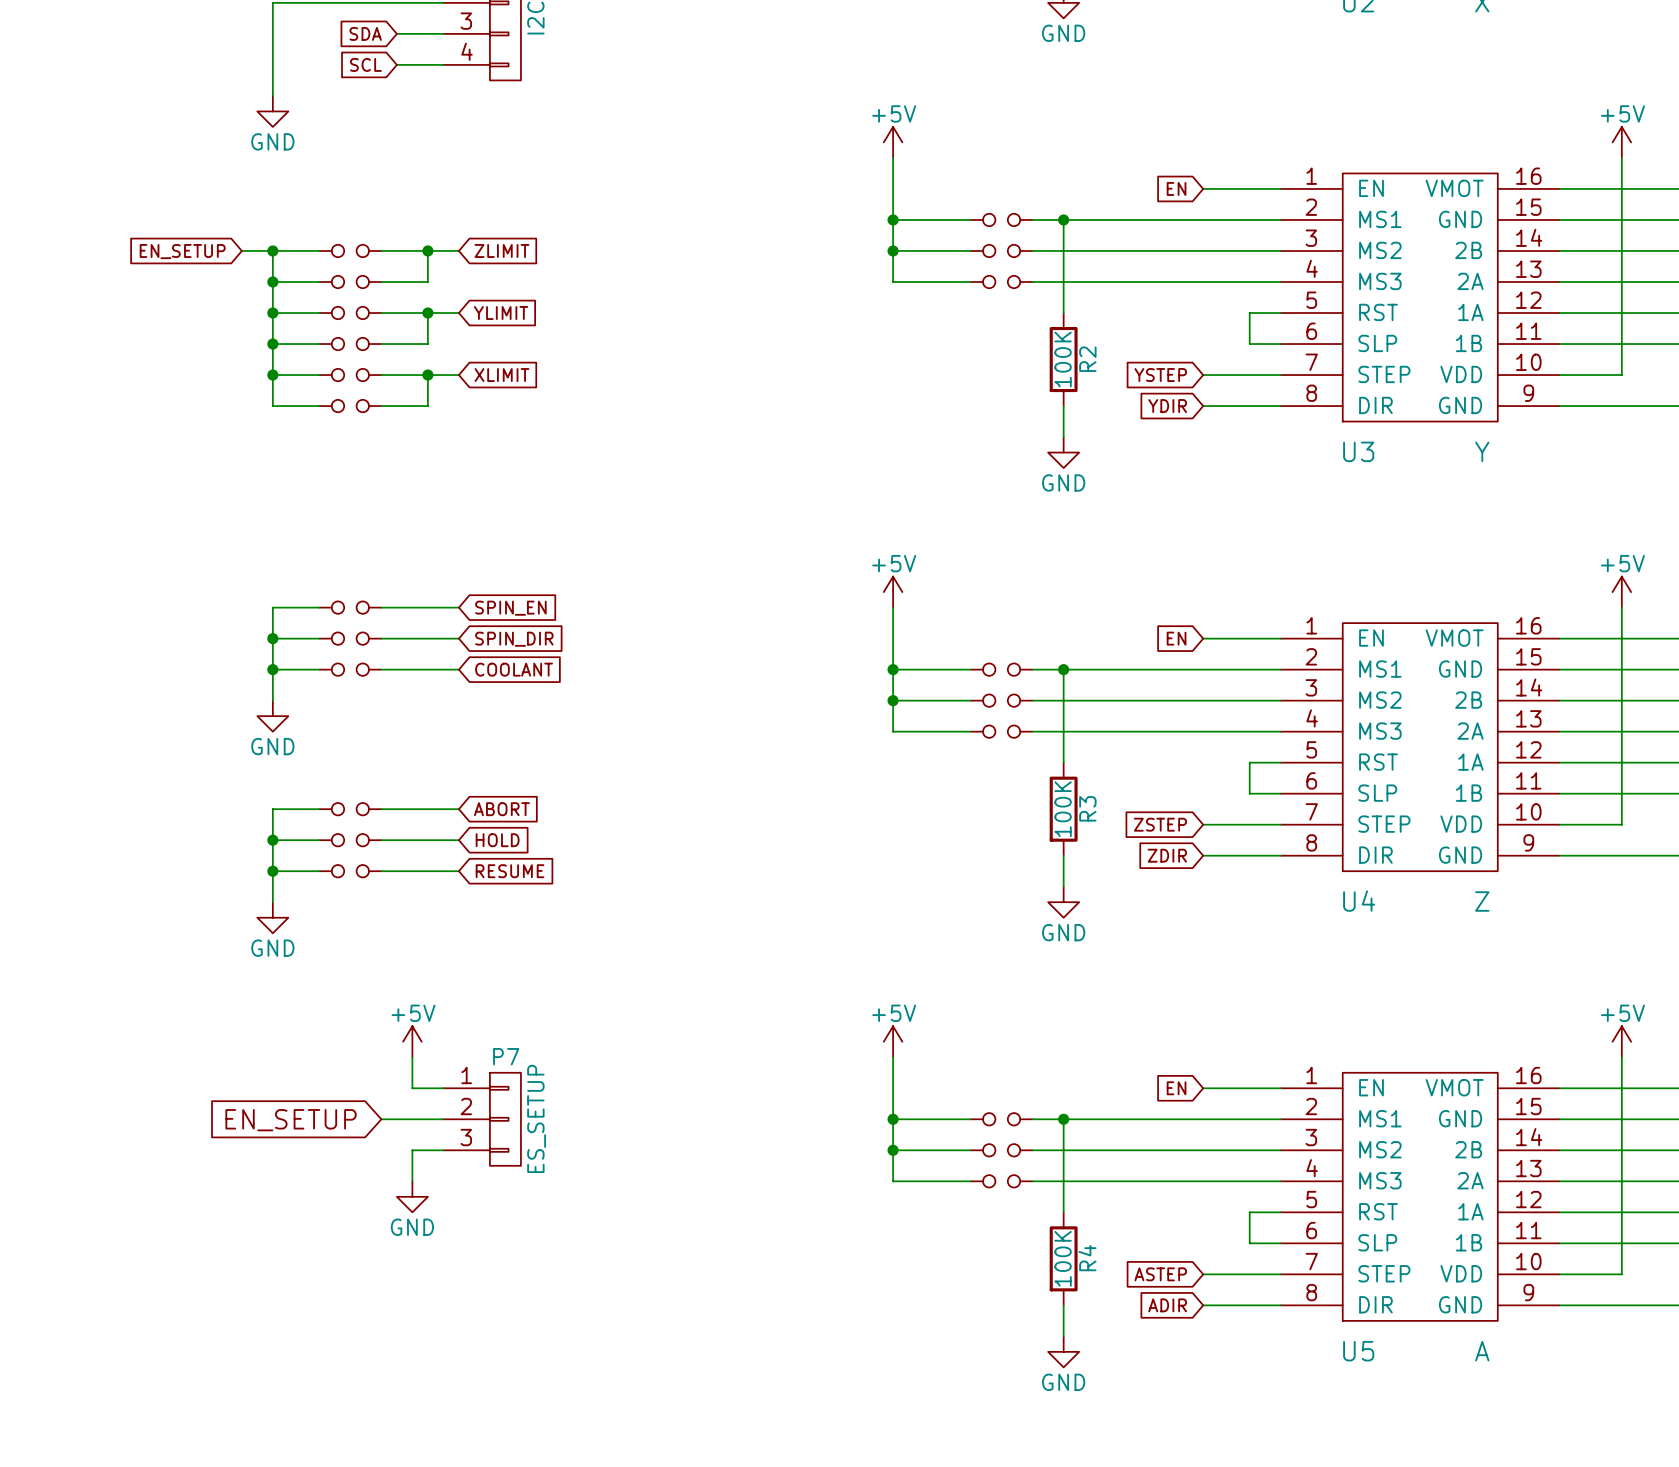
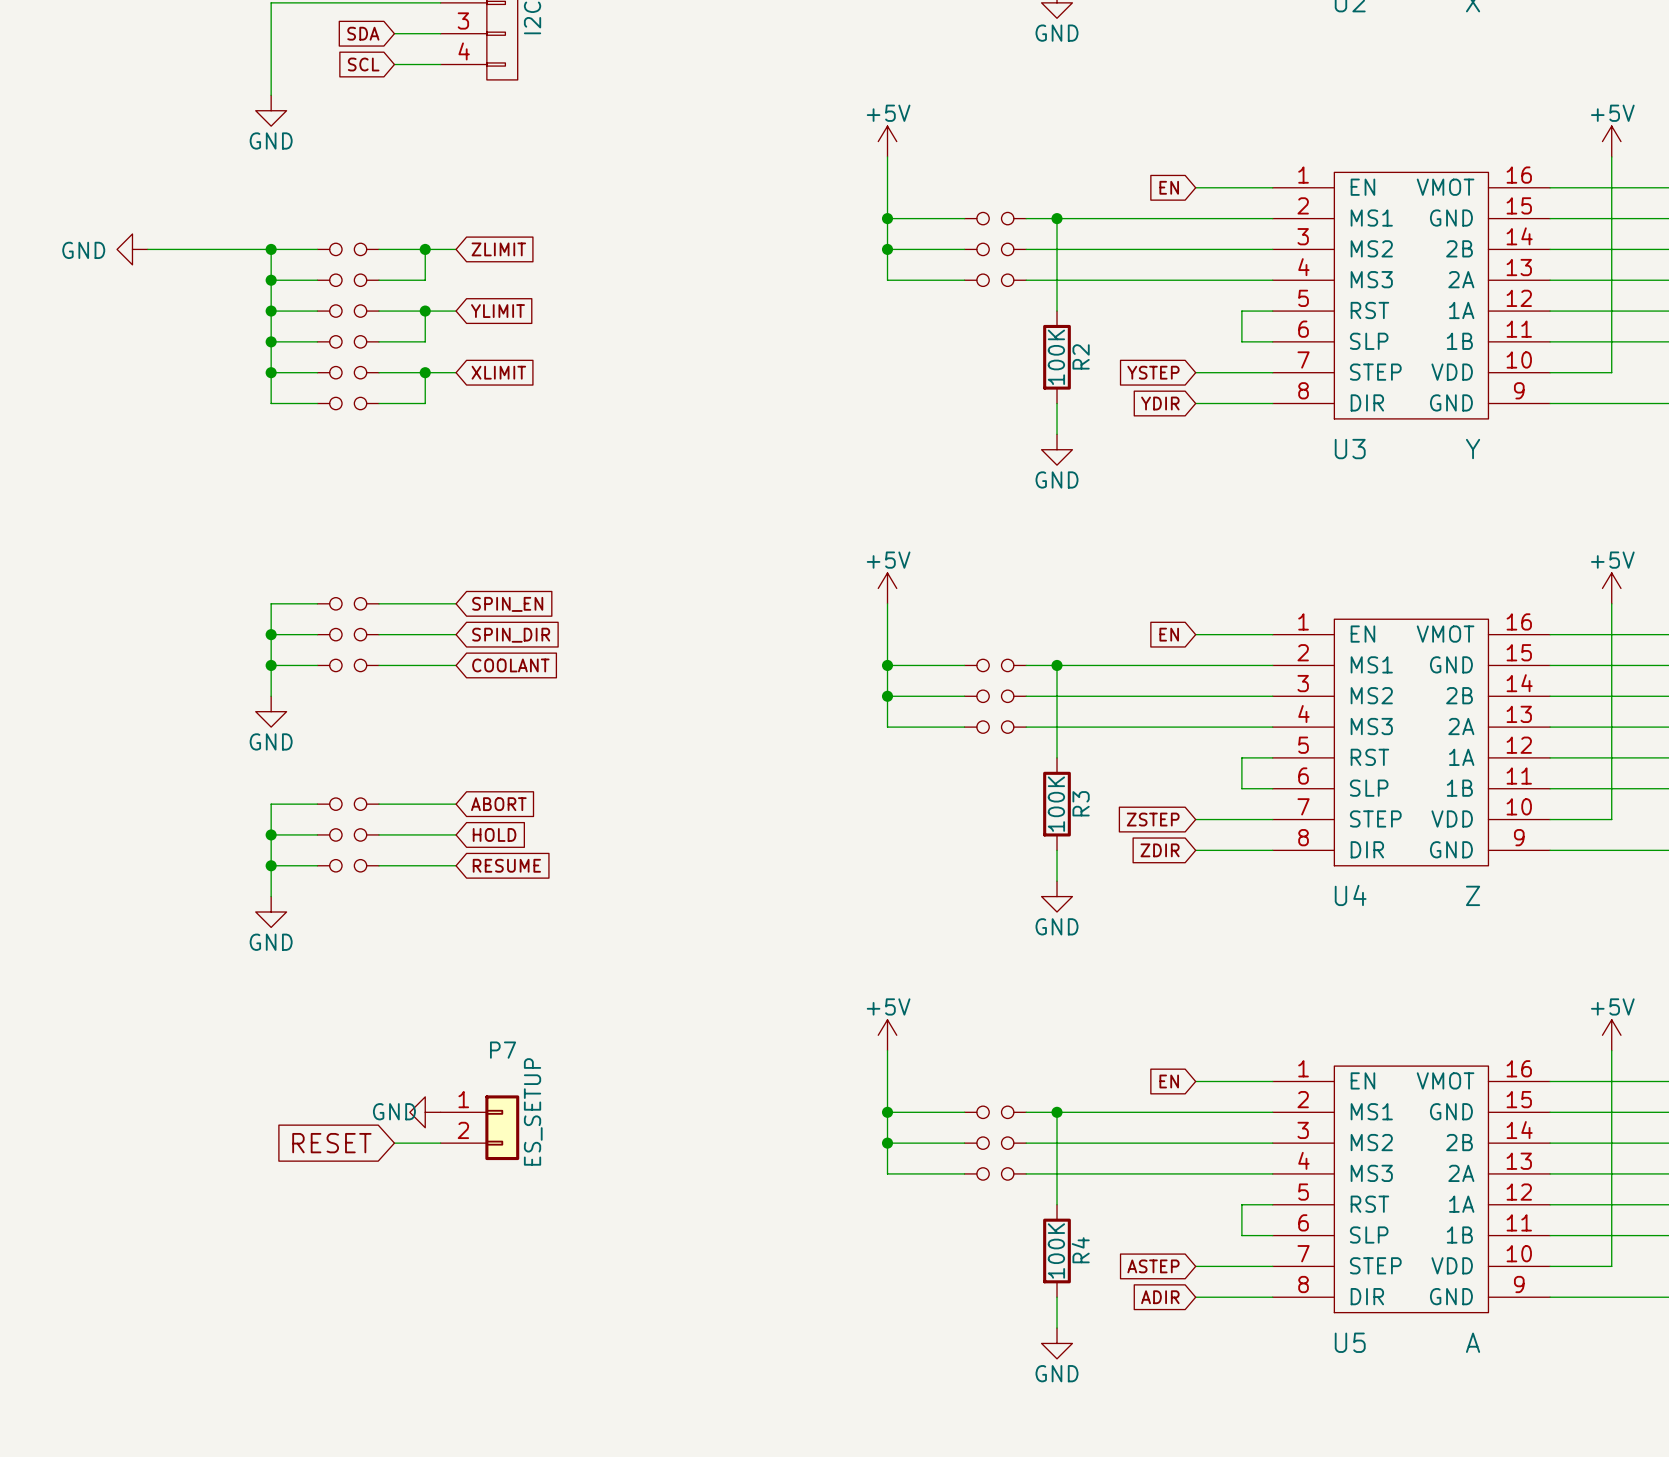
power symbol: none -> GND (132, 249)
wire: none -> (147, 249) (240, 249)
global label: EN_SETUP (182, 251) -> none
power symbol: +5V (412, 1041) -> none
wire: (412, 1057) (412, 1088) (443, 1088) -> none
P7 symbol: [443, 1072, 521, 1166] -> [440, 1095, 520, 1161]
wire: (381, 1119) (443, 1119) -> none
global label: EN_SETUP (291, 1120) -> RESET (331, 1143)
wire: (412, 1150) (412, 1181) -> (409, 1143) (394, 1143)
power symbol rotation: 0° (412, 1196) -> 90° clockwise (425, 1112)
power symbol position: GND (412, 1196) -> GND (425, 1112)

